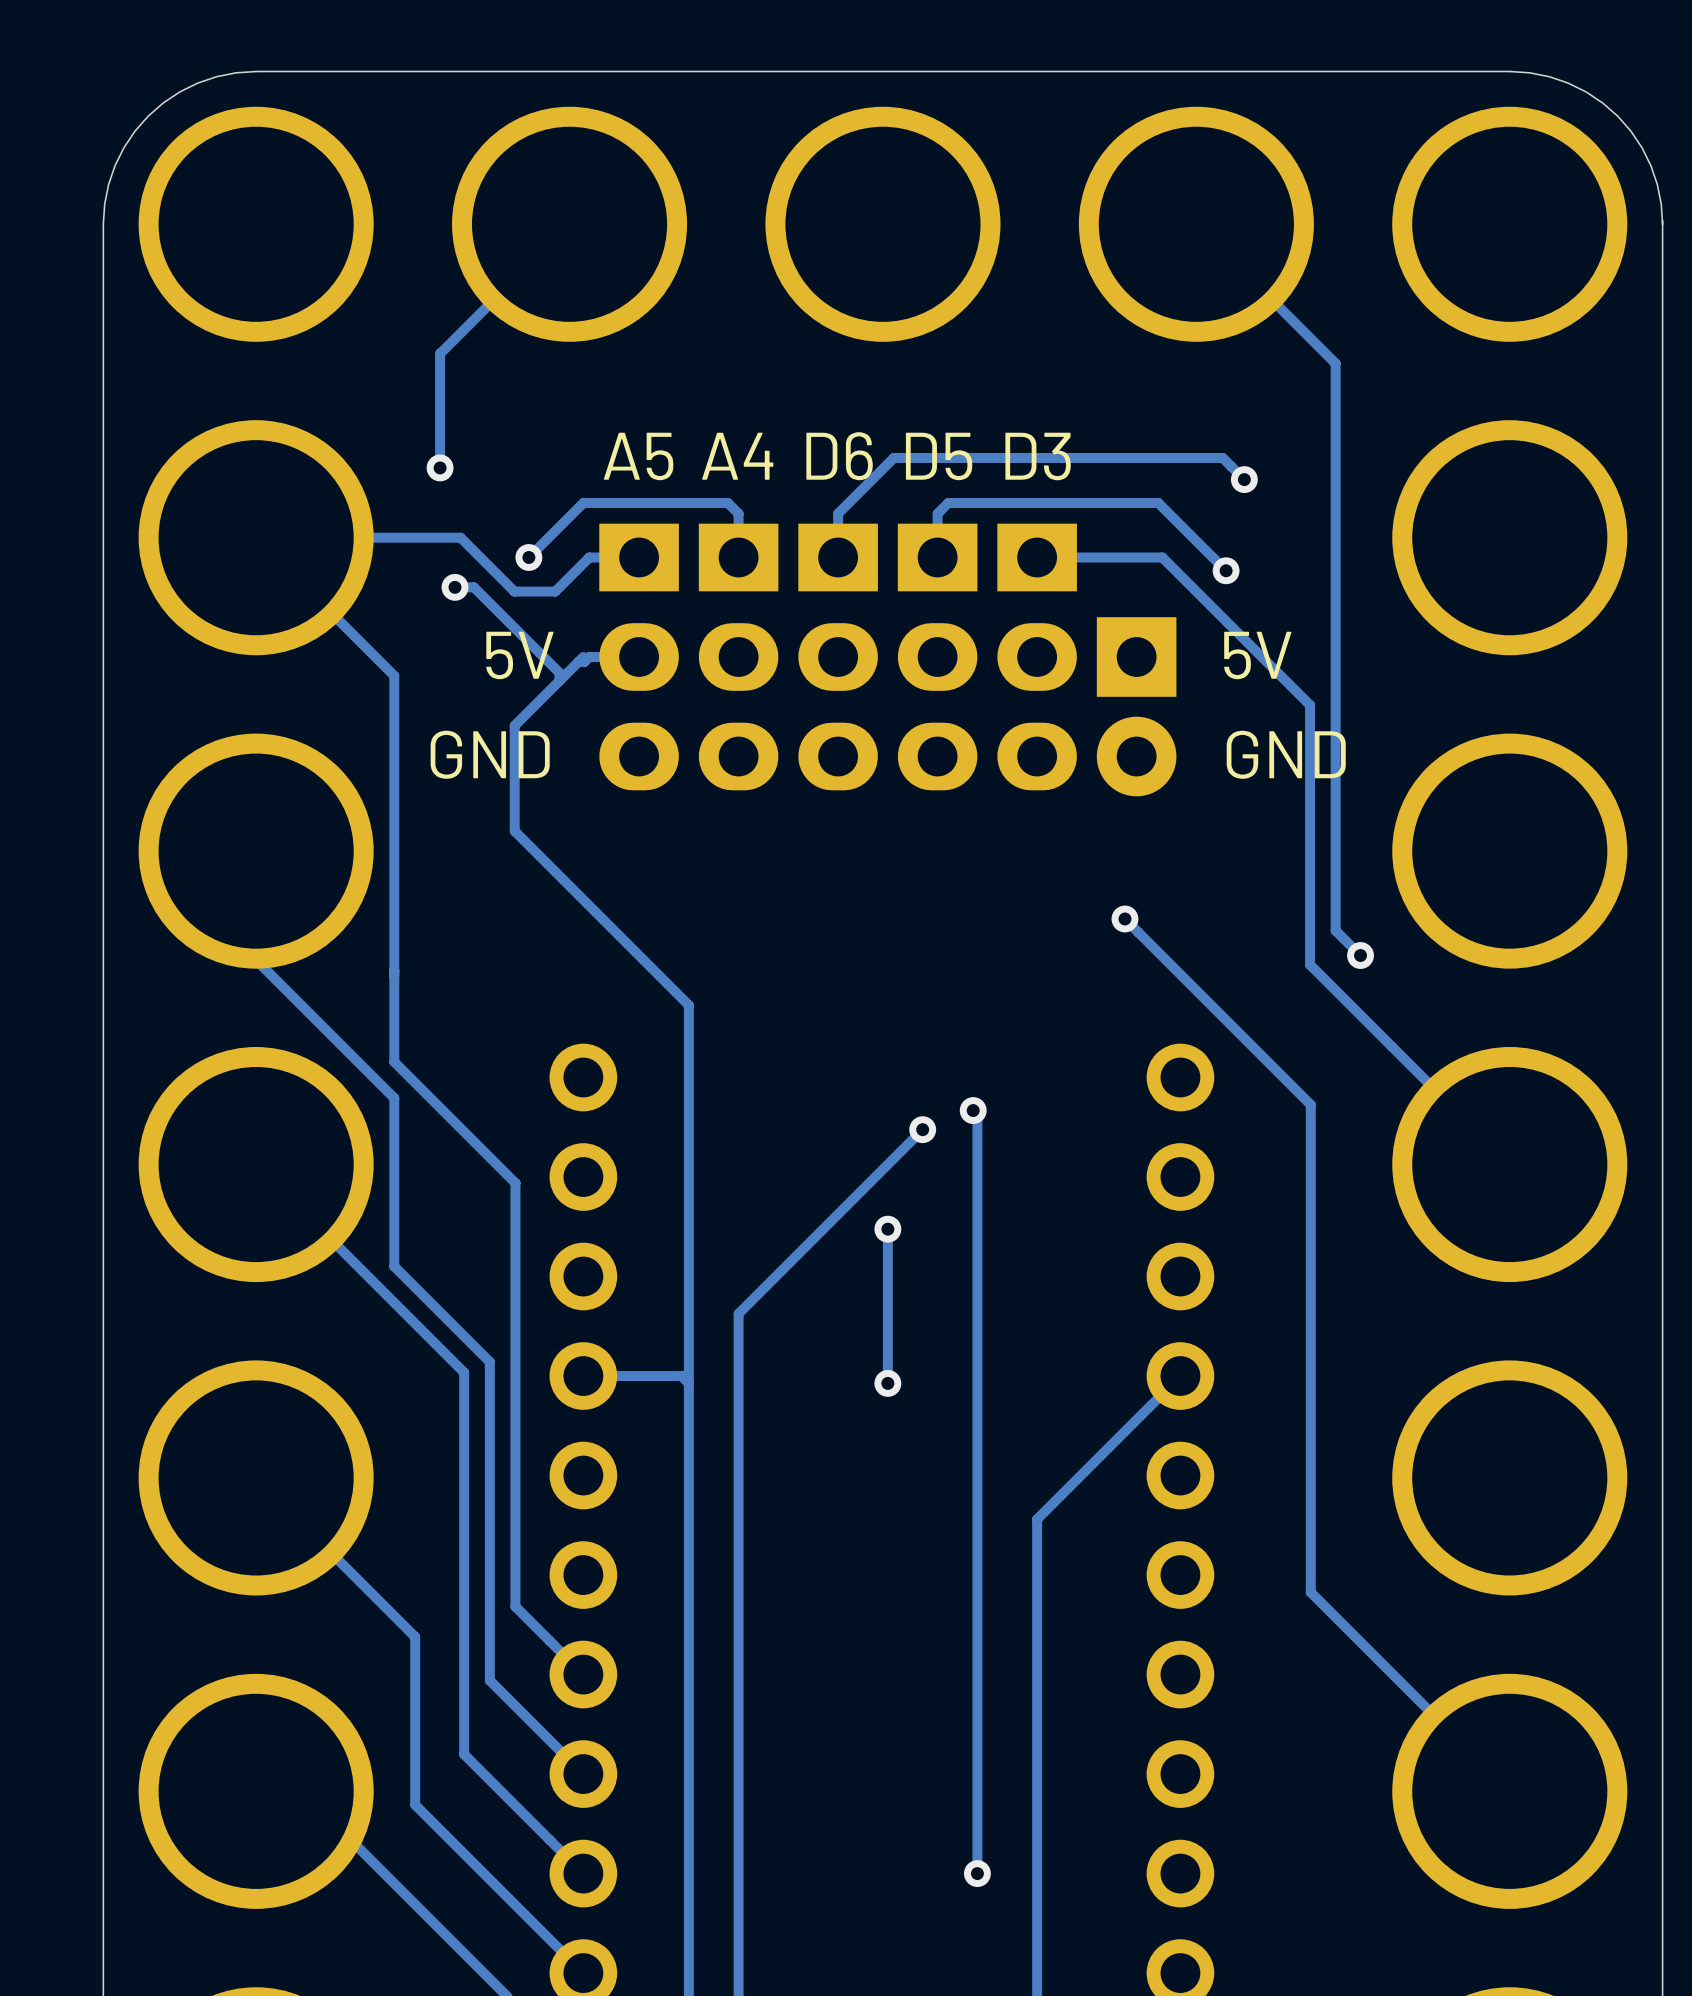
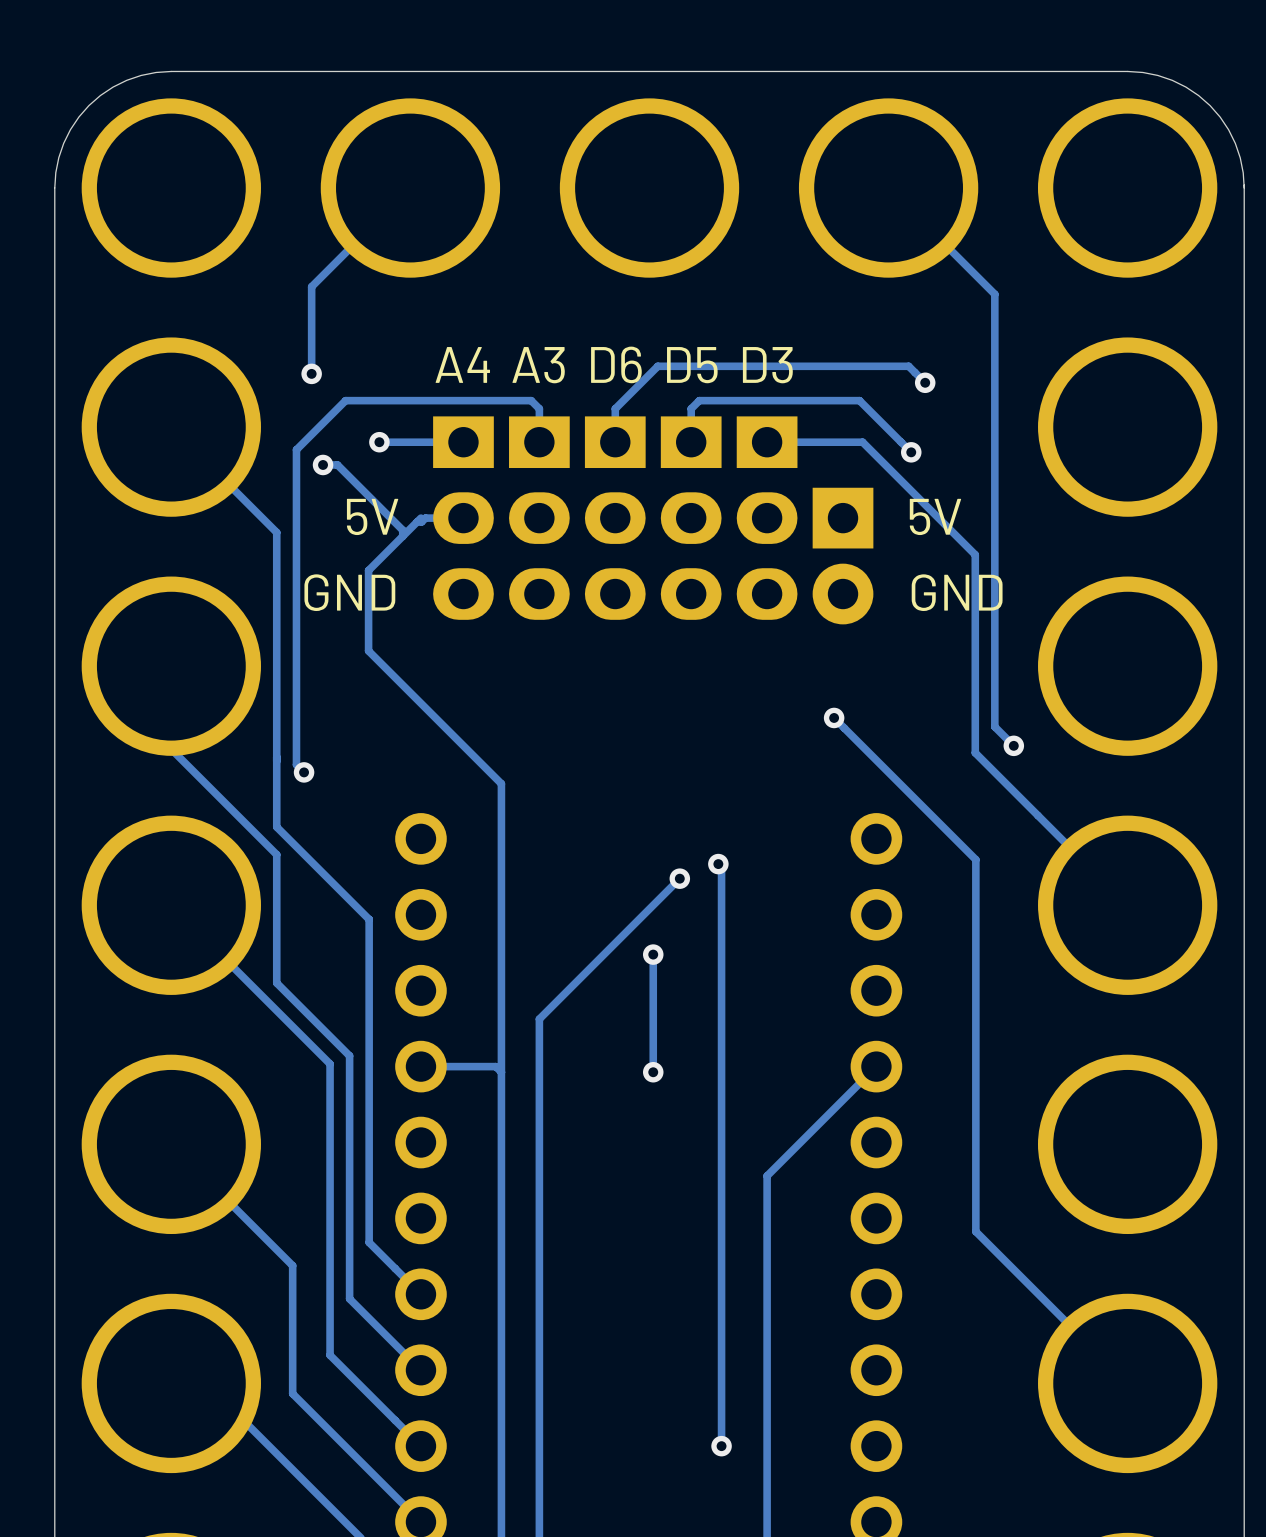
text: A5 (638, 456) -> A4 (462, 364)
text: A4 (737, 456) -> A3 (538, 365)
track: (583, 503) (528, 557) -> (425, 442) (379, 442)
track: none -> (420, 400) (345, 400) (296, 449) (296, 764) (304, 772)
track: (256, 537) (460, 537) (514, 591) (555, 591) (589, 557) -> none
via: none -> (304, 772)

